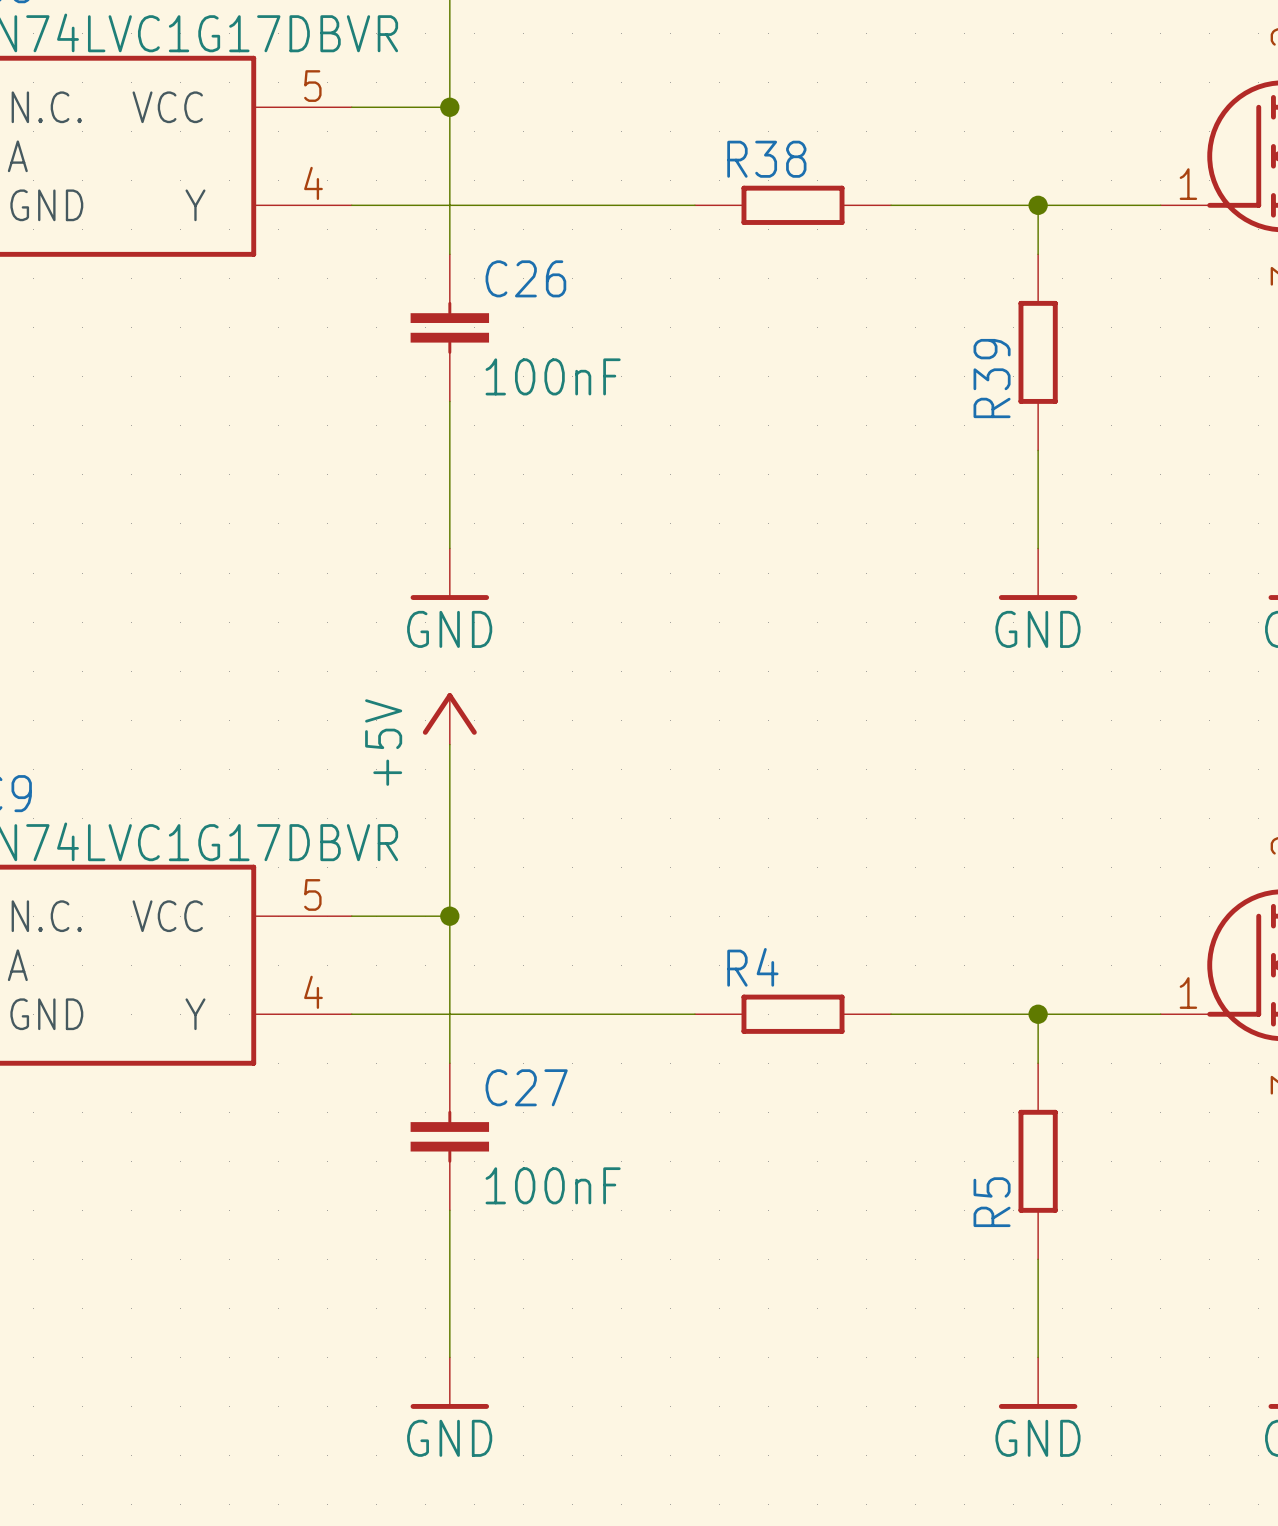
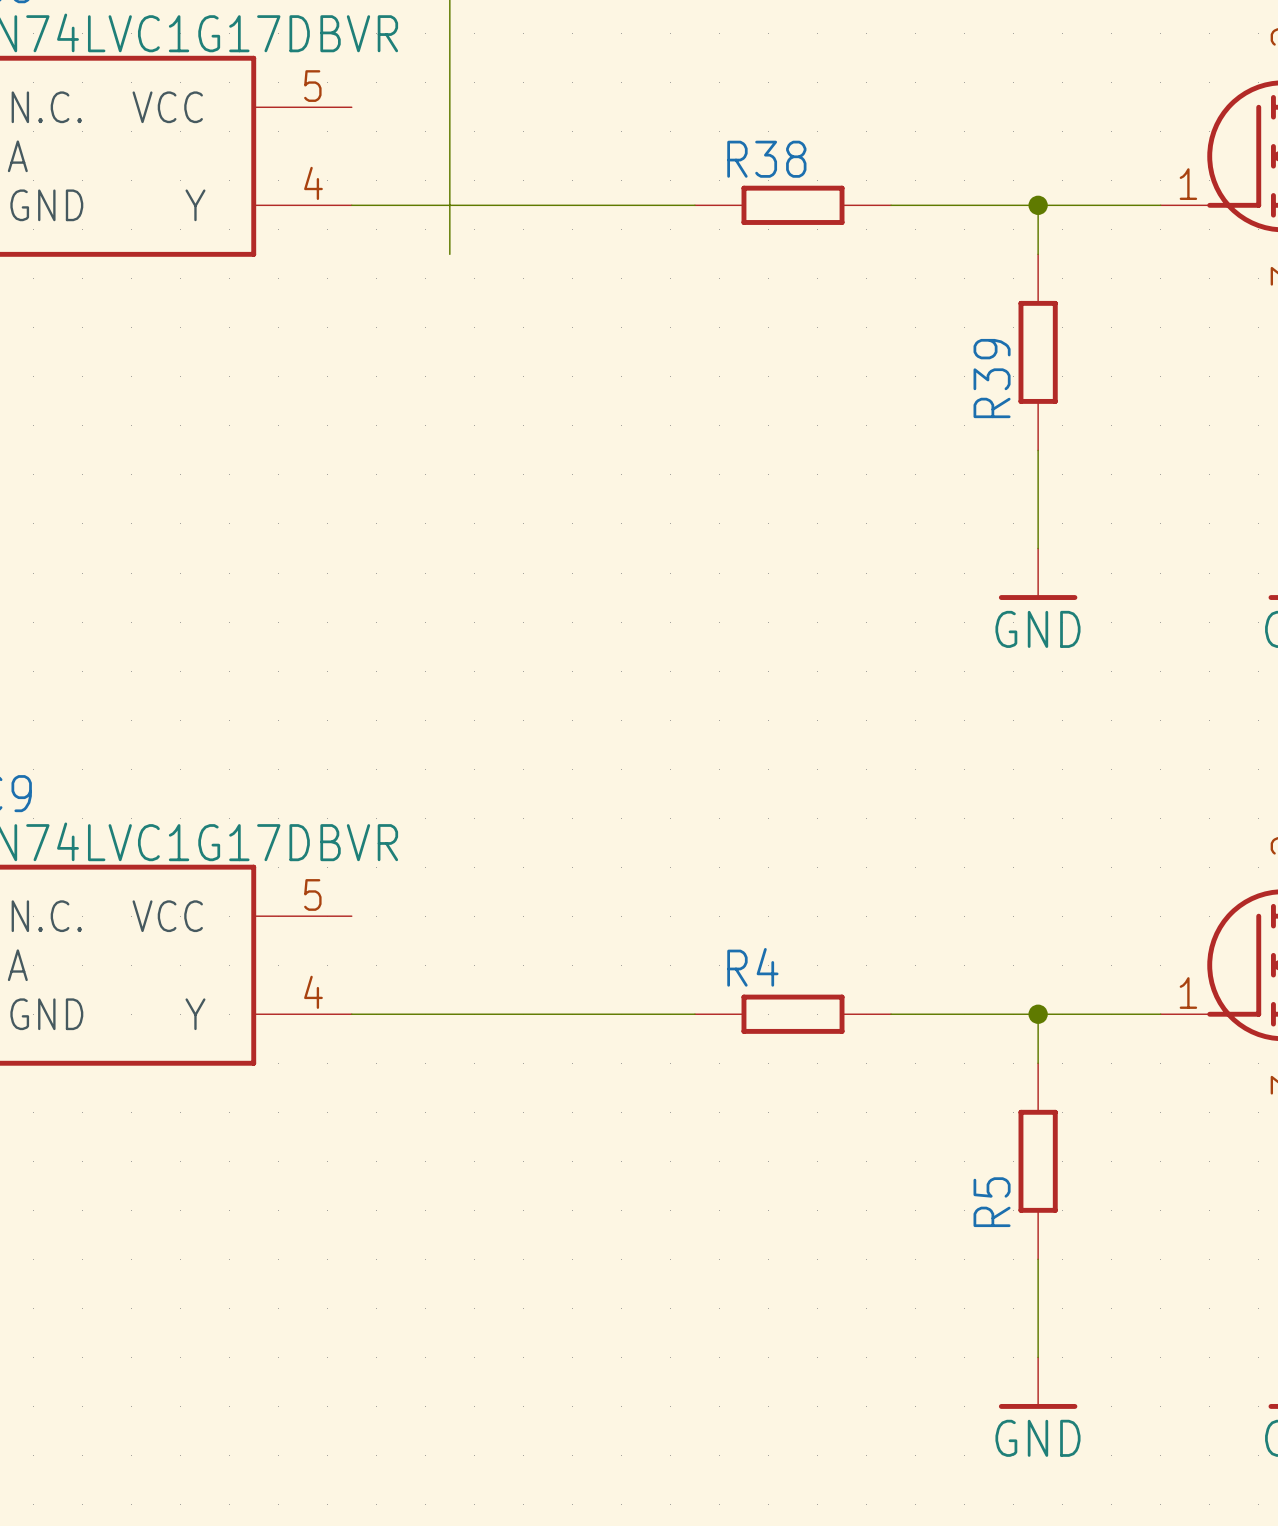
wire: (351, 107) (449, 107) -> none
junction: (449, 107) -> none
C26: 100nF (449, 327) -> none
wire: (449, 401) (449, 548) -> none
power symbol: GND (449, 574) -> none
power symbol: +5V (449, 718) -> none
wire: (449, 744) (449, 1063) -> none
wire: (351, 916) (449, 916) -> none
junction: (449, 916) -> none
C27: 100nF (449, 1136) -> none
wire: (449, 1210) (449, 1357) -> none
power symbol: GND (449, 1383) -> none

